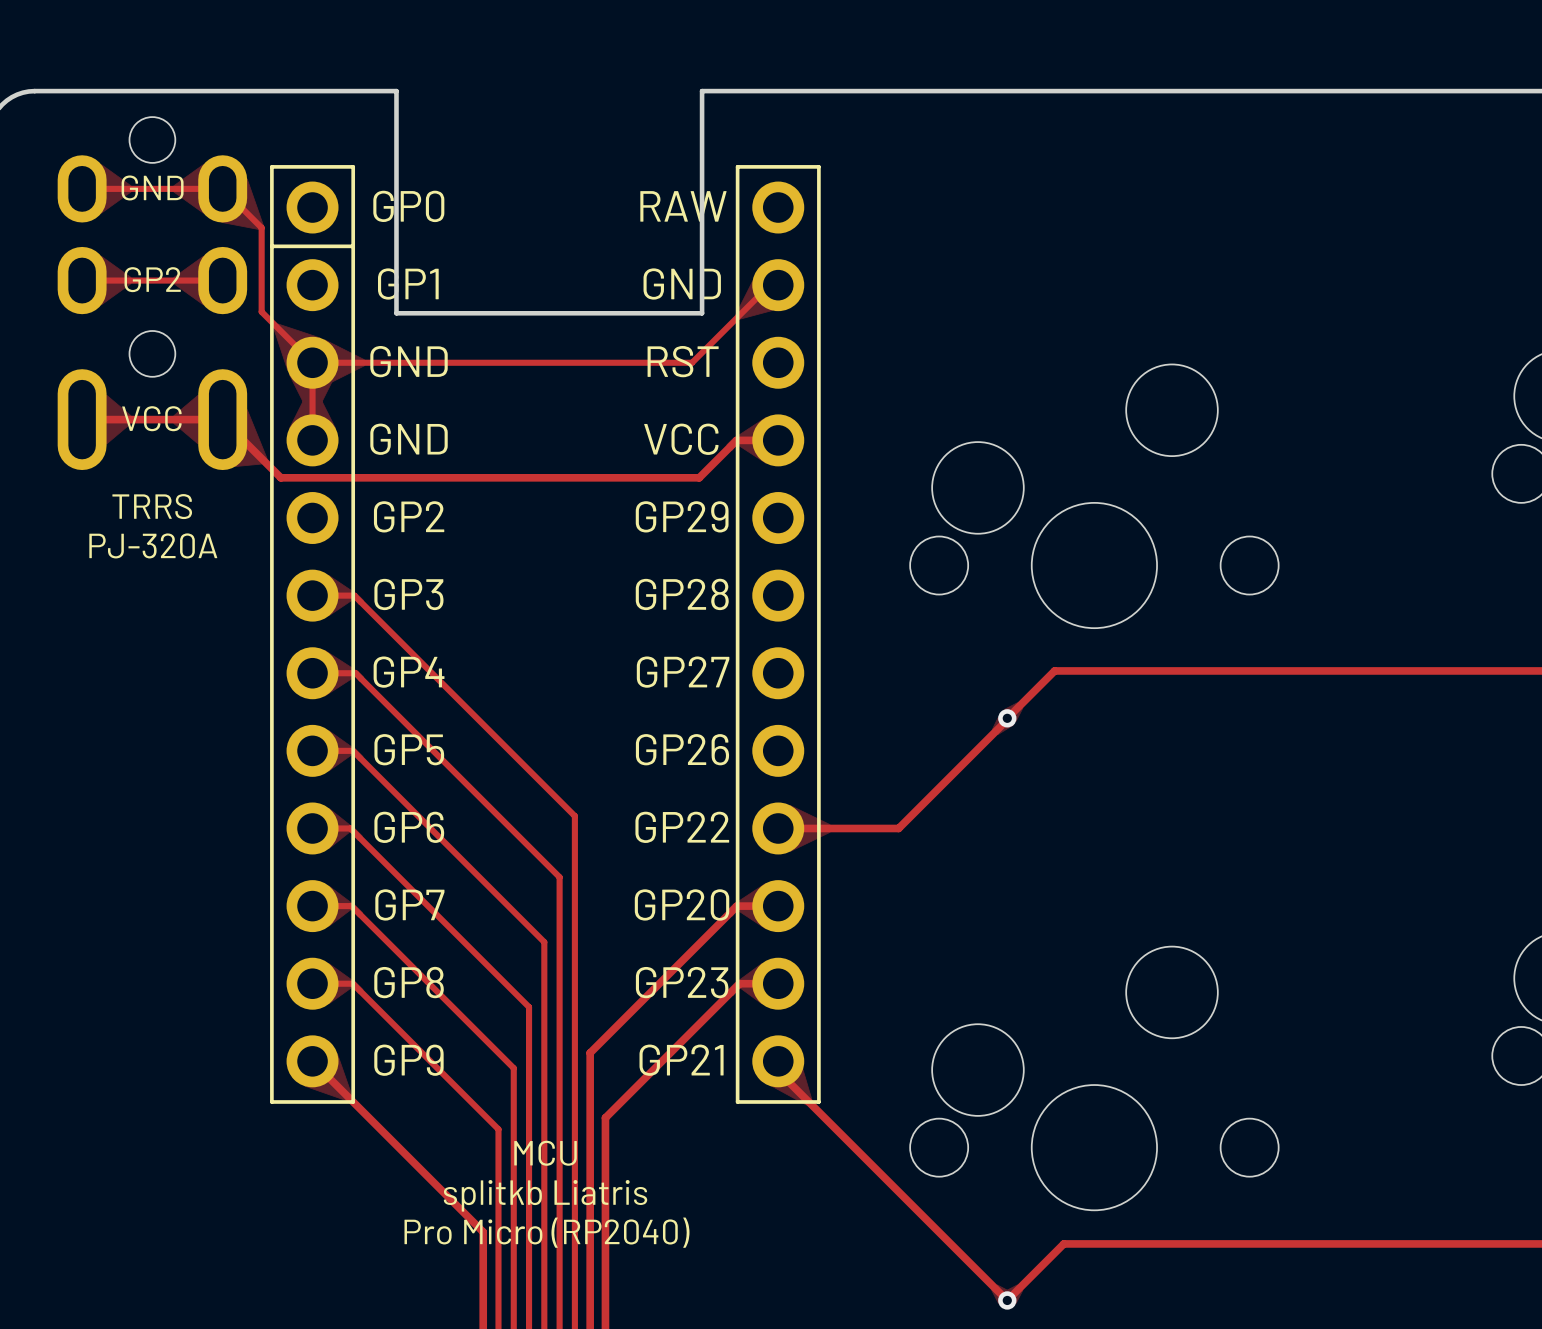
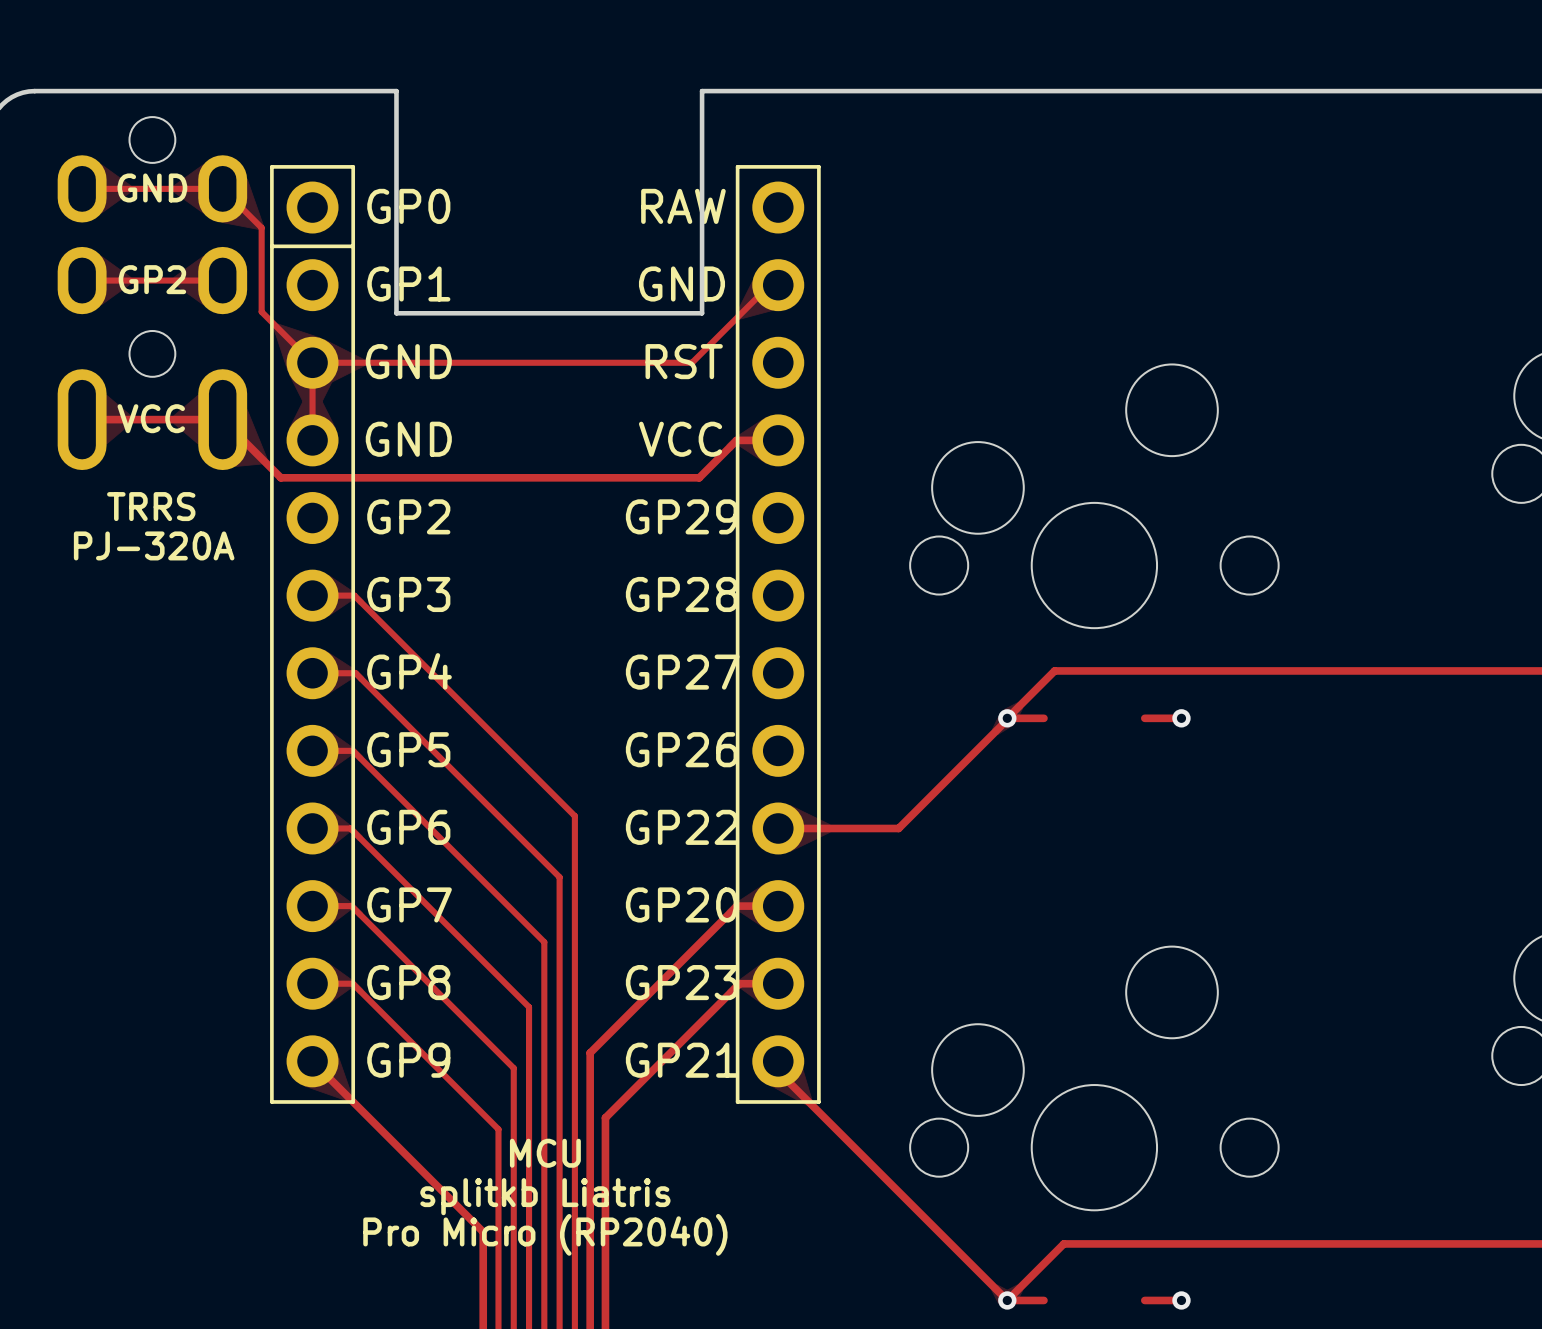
track: none -> (1007, 718) (1043, 718)
track: none -> (1144, 718) (1181, 718)
via: none -> (1181, 718)
track: none -> (1007, 1300) (1043, 1300)
track: none -> (1144, 1300) (1181, 1300)
via: none -> (1181, 1300)

